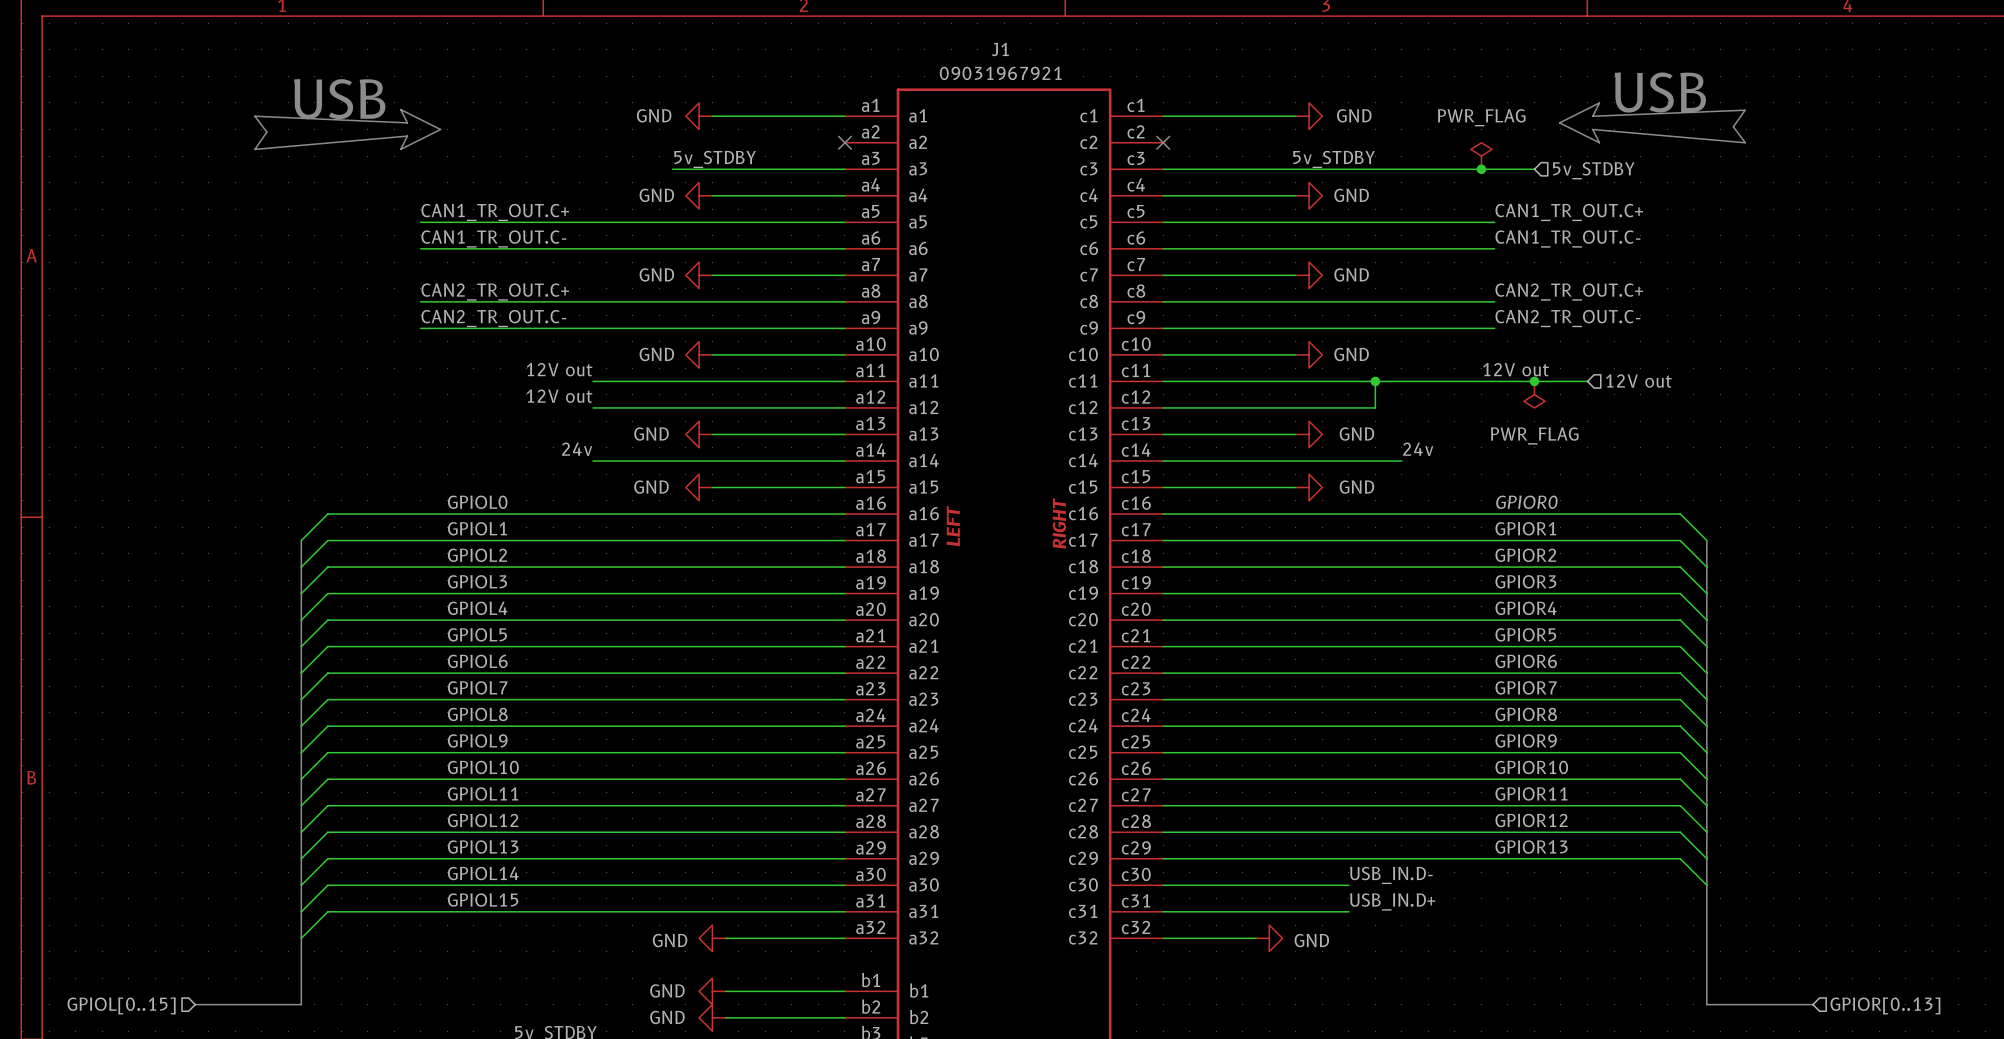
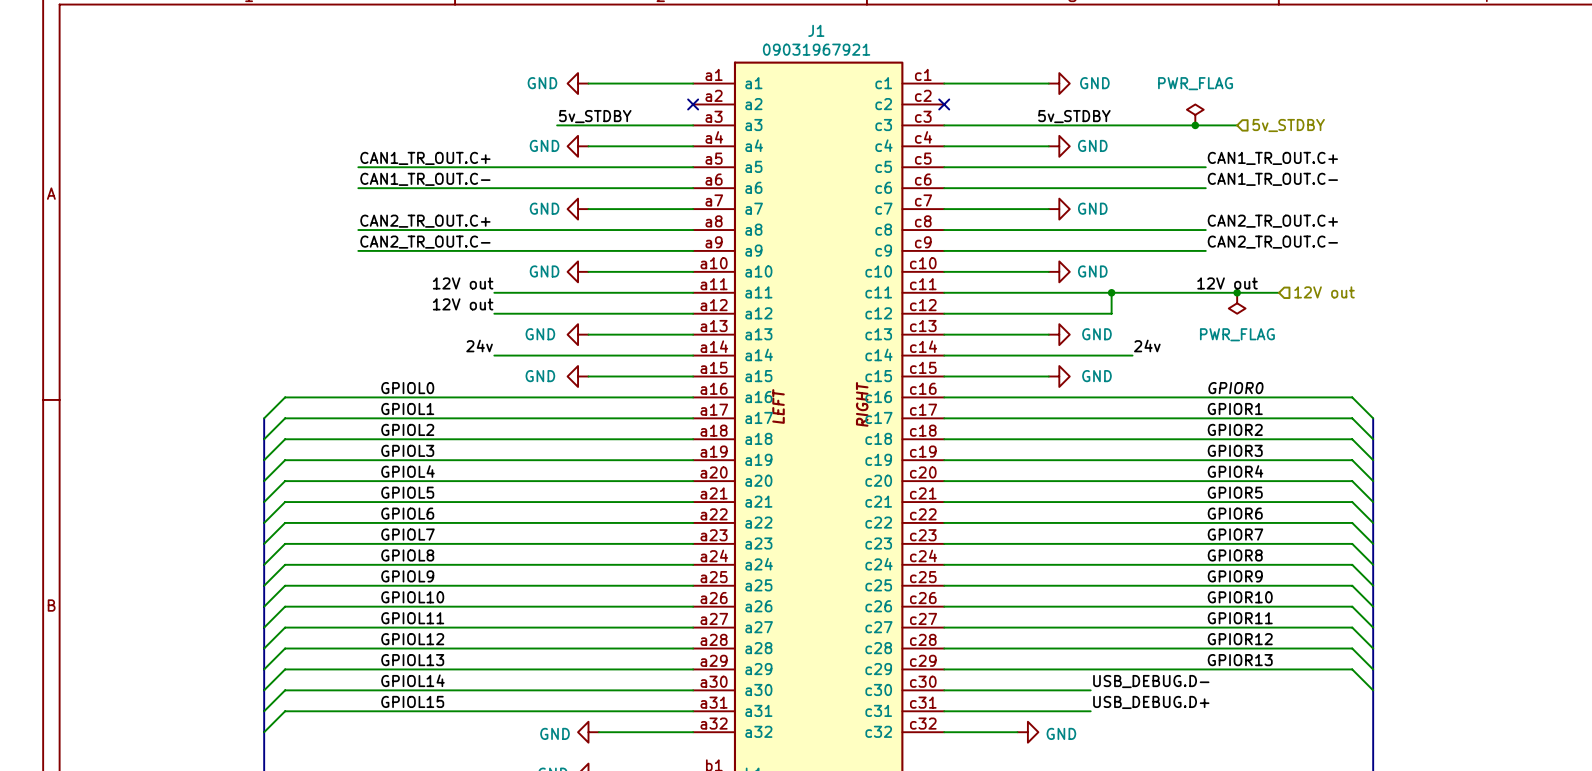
text: USB (1660, 92) -> none
text: USB (339, 99) -> none
line: (1599, 102) (1592, 116) (1745, 110) (1733, 126) (1745, 142) (1592, 129) (1599, 142) (1559, 122) (1599, 102) -> none
line: (400, 109) (407, 122) (254, 116) (266, 132) (254, 149) (407, 136) (400, 149) (440, 129) (400, 109) -> none
label: USB_IN.D- (1391, 875) -> USB_DEBUG.D- (1151, 681)
label: USB_IN.D+ (1392, 901) -> USB_DEBUG.D+ (1151, 702)

